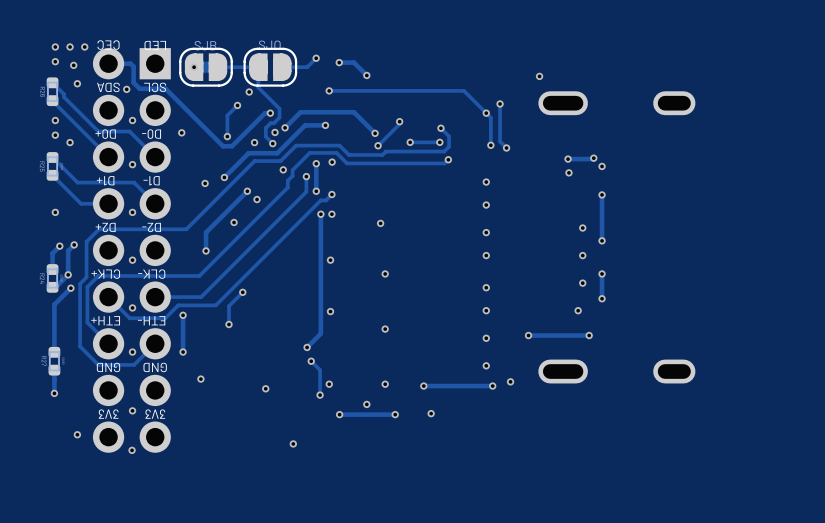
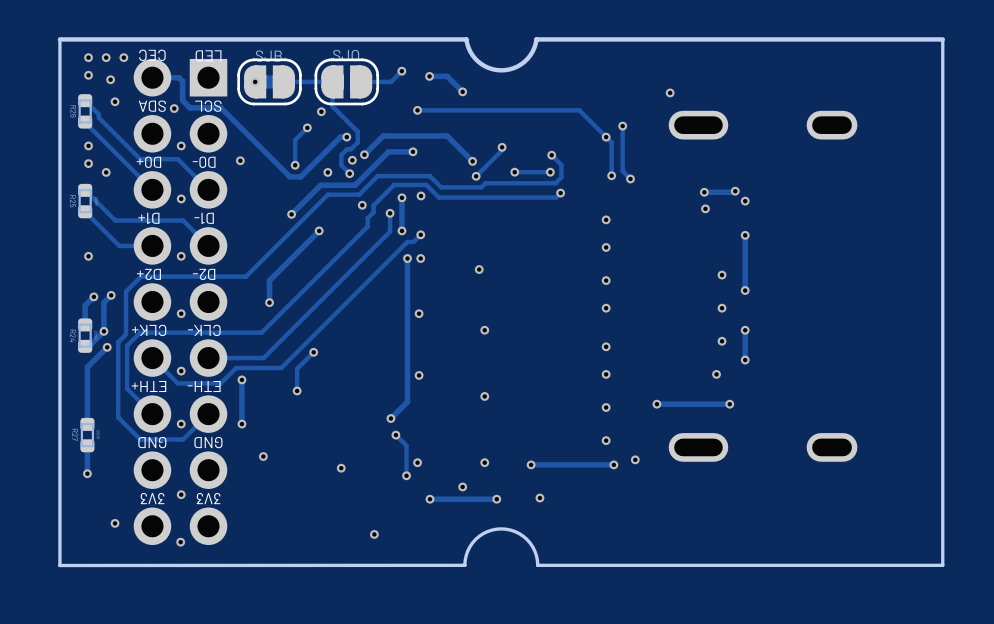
board edge: none -> (942, 39) (942, 565) (537, 565) (534, 551) (527, 539) (515, 531) (501, 528) (487, 531) (475, 539) (467, 551) (464, 565) (59, 565) (59, 39) (466, 39) (470, 51) (478, 61) (488, 68) (501, 70) (513, 68) (524, 61) (532, 51) (536, 39) (942, 39)
via: (205, 183) -> none
via: (257, 199) -> none
via: (234, 222) -> none

